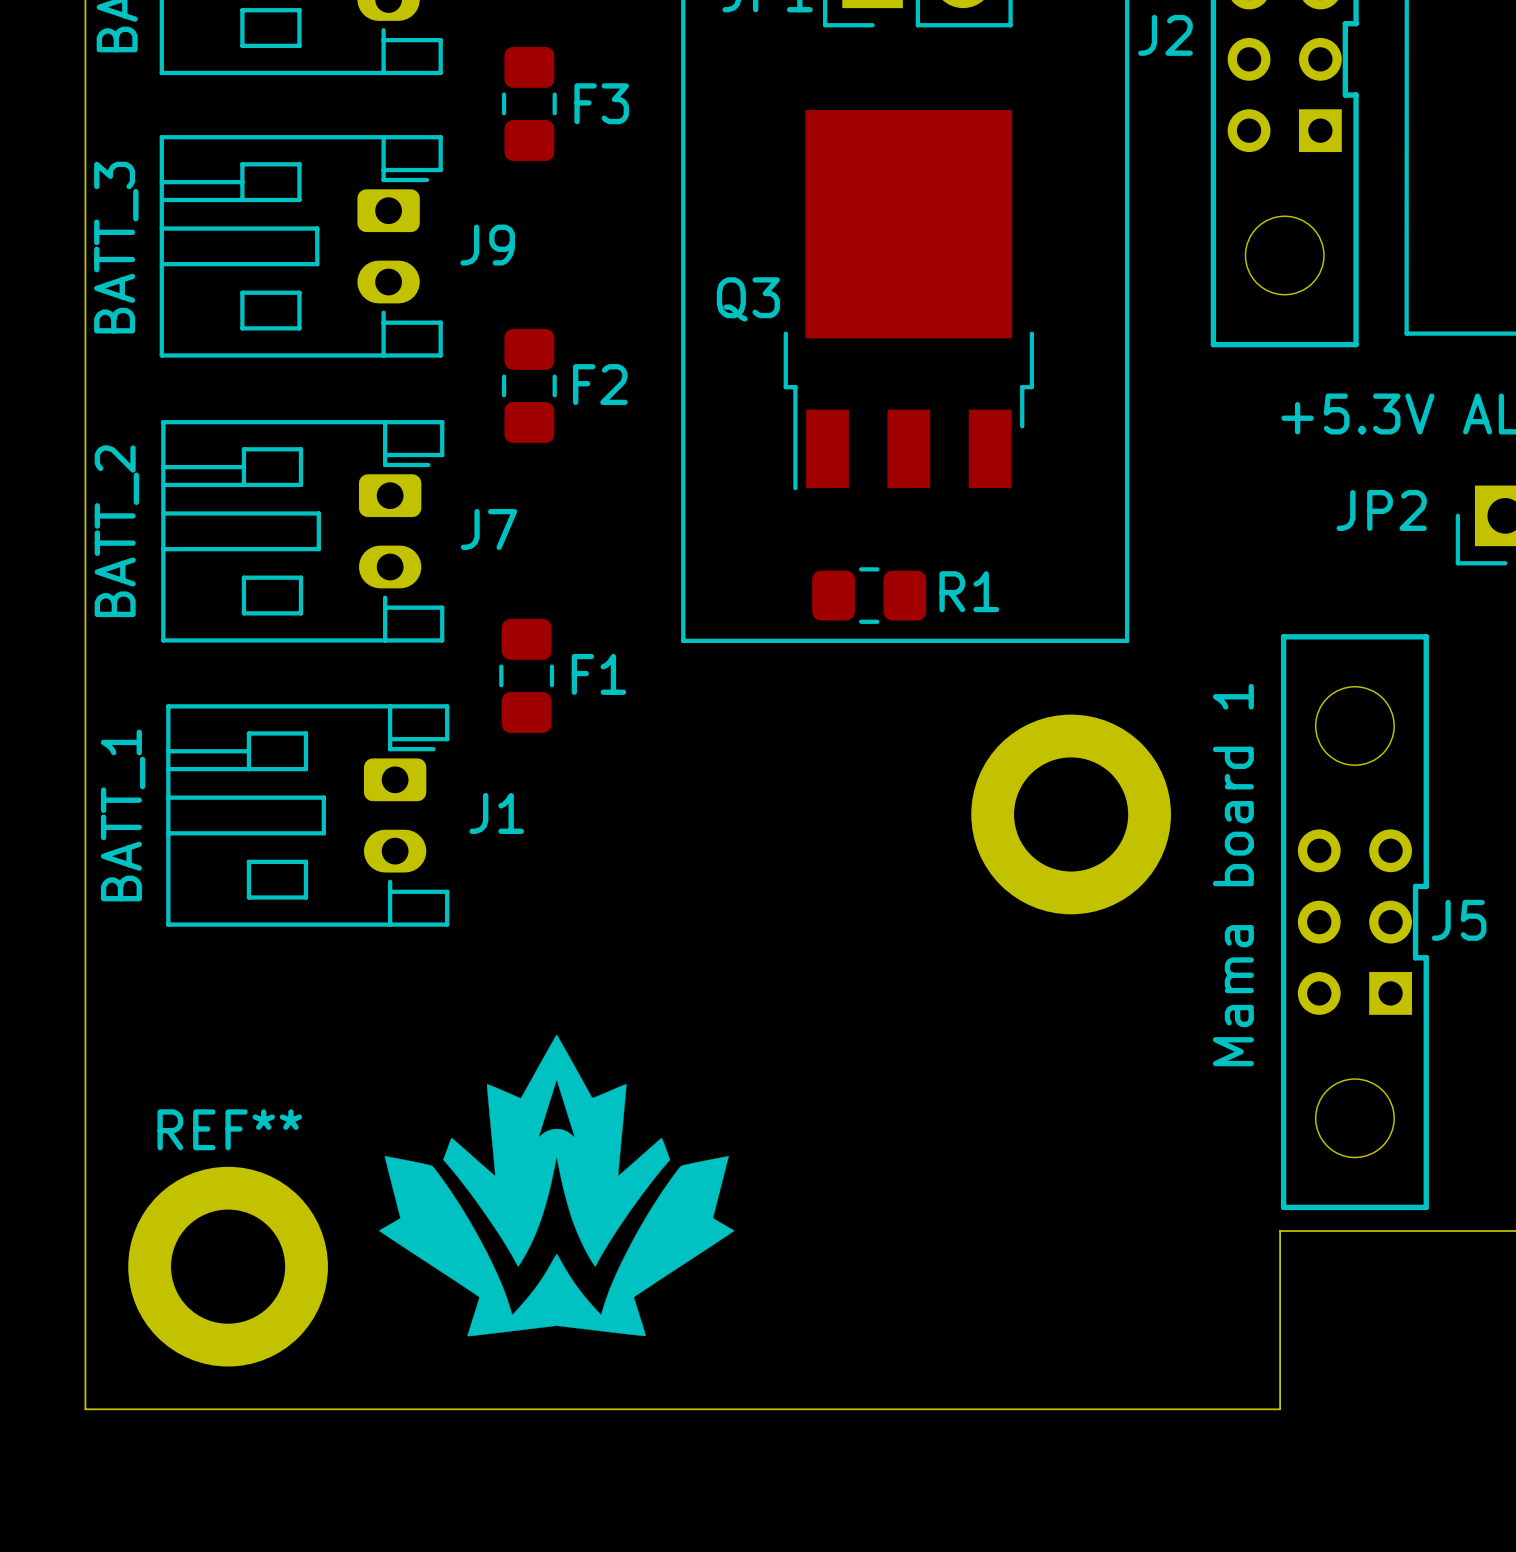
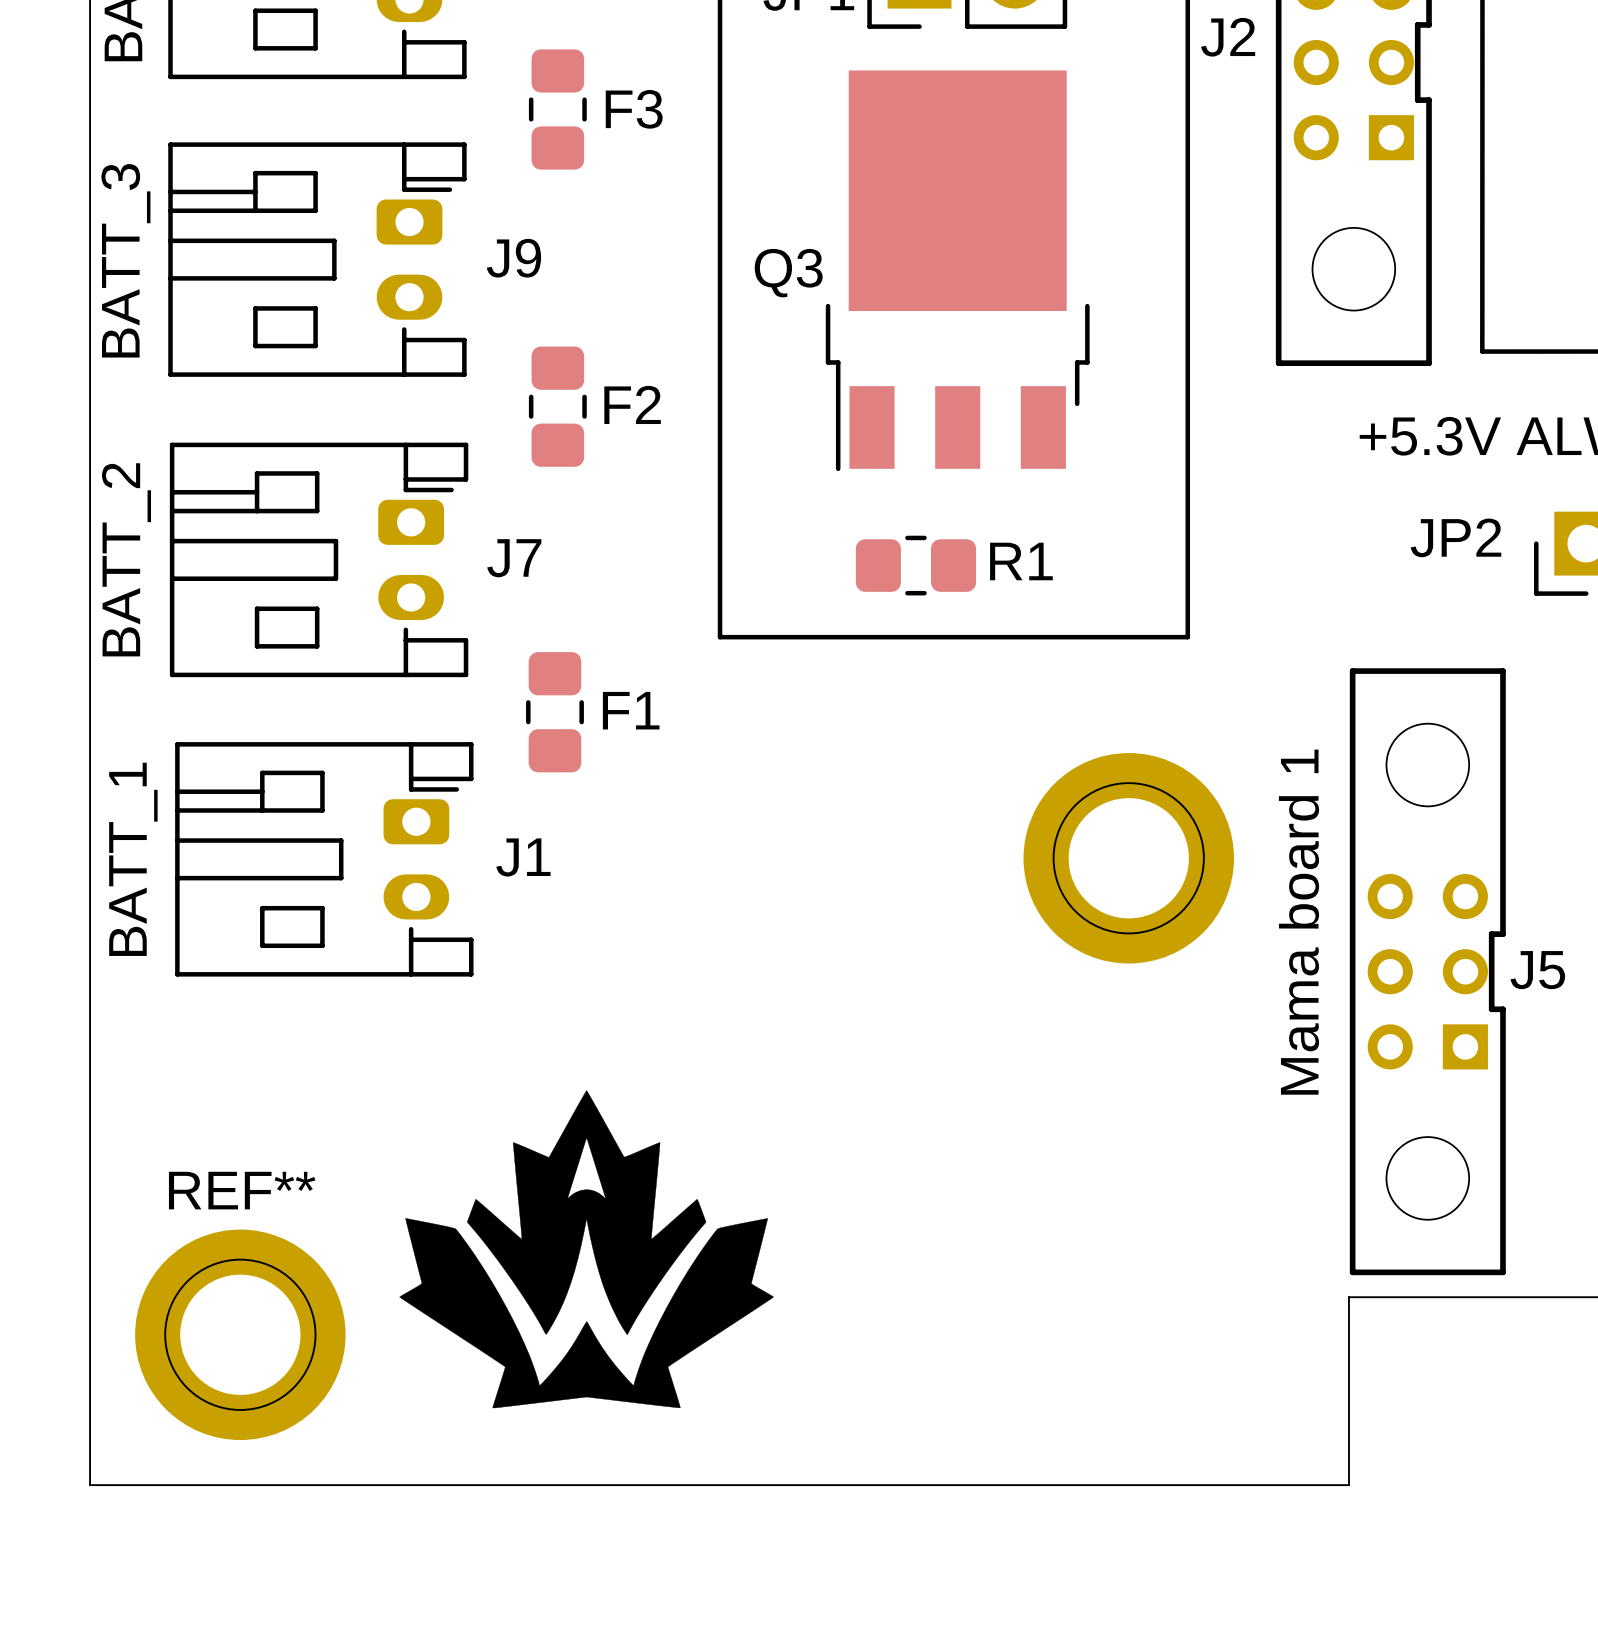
Q3 position: (908, 300) -> (957, 270)
R1 position: (869, 595) -> (915, 565)
line: (683, 604) (683, 640) (1127, 640) (1127, 604) -> (720, 637) (1187, 637)

